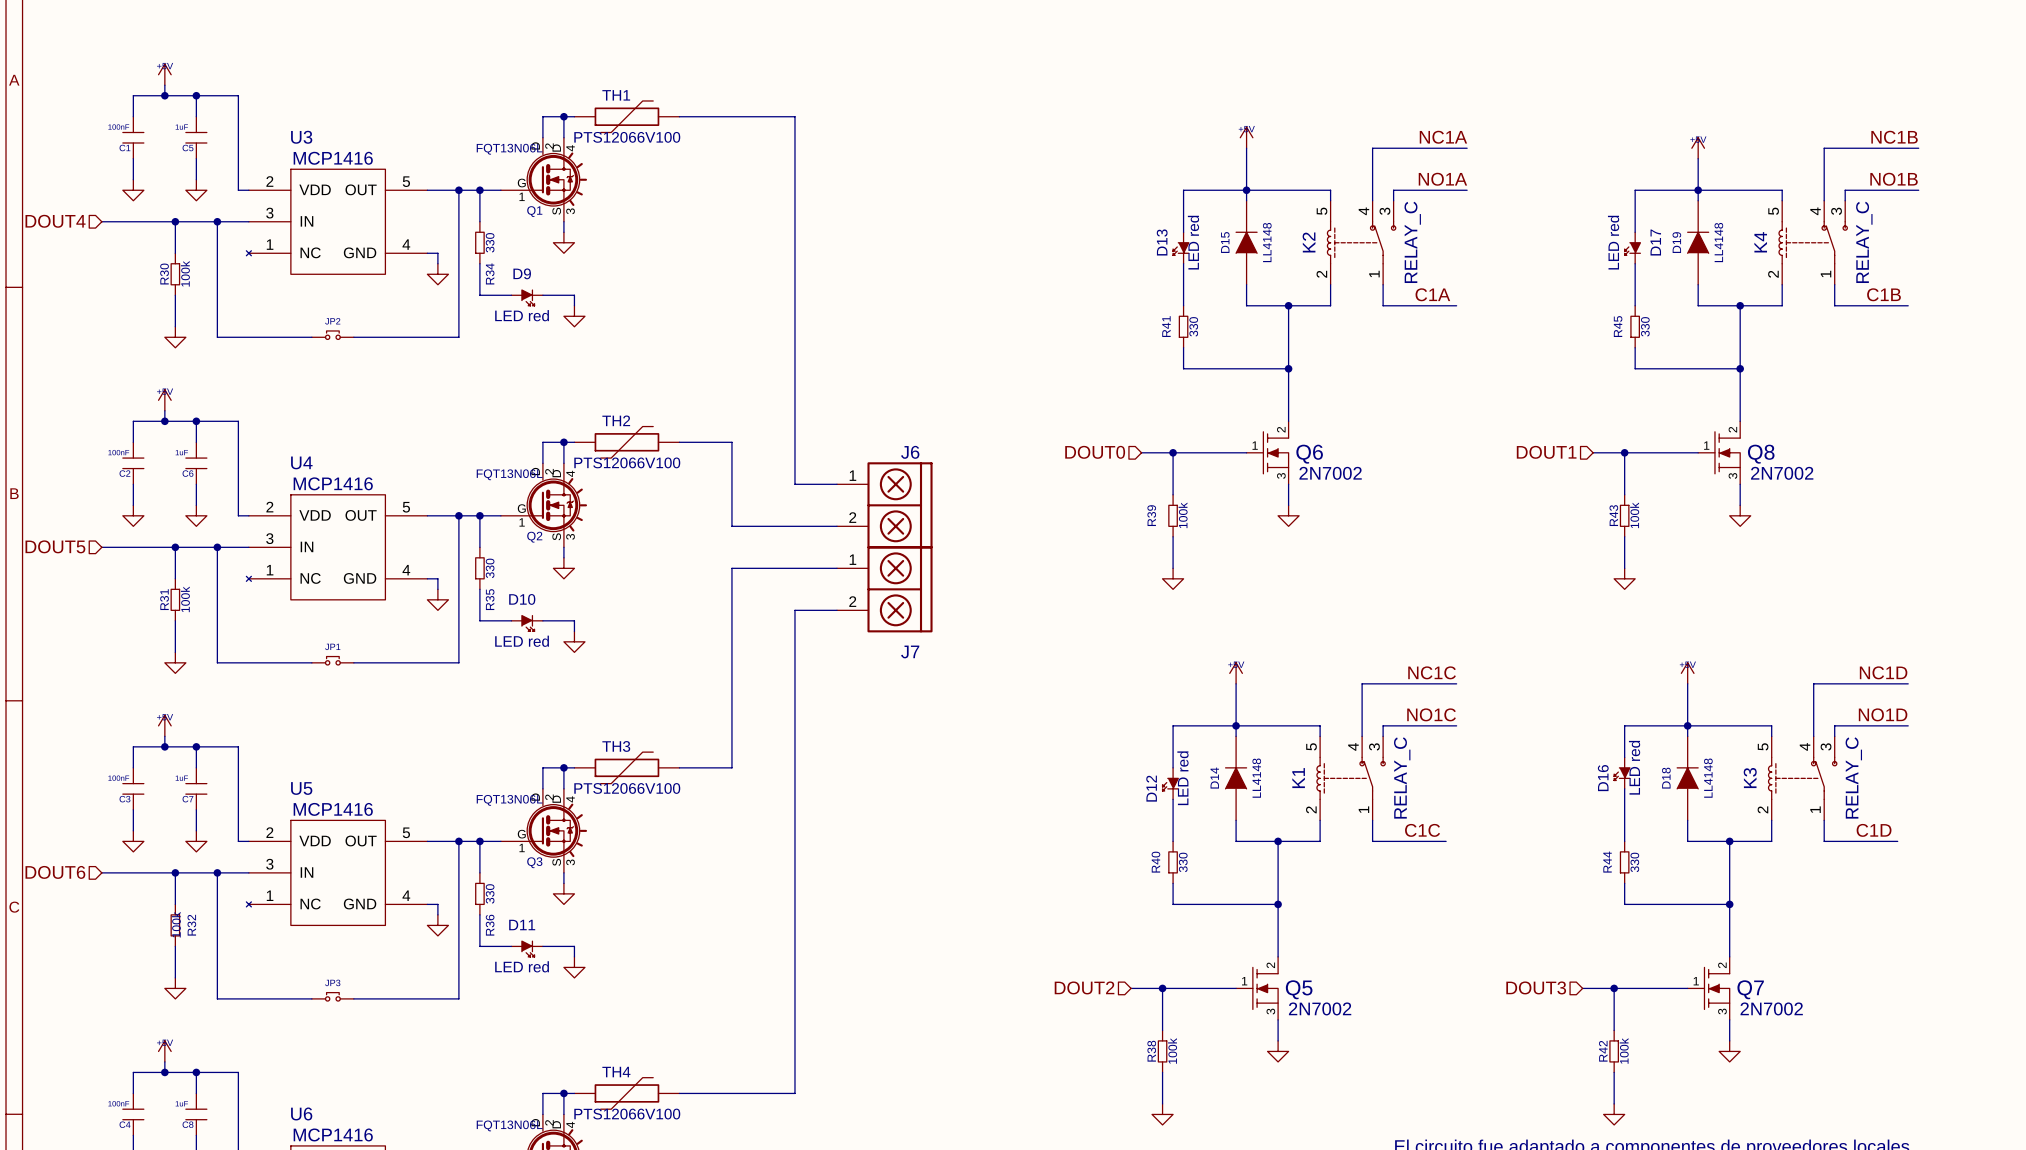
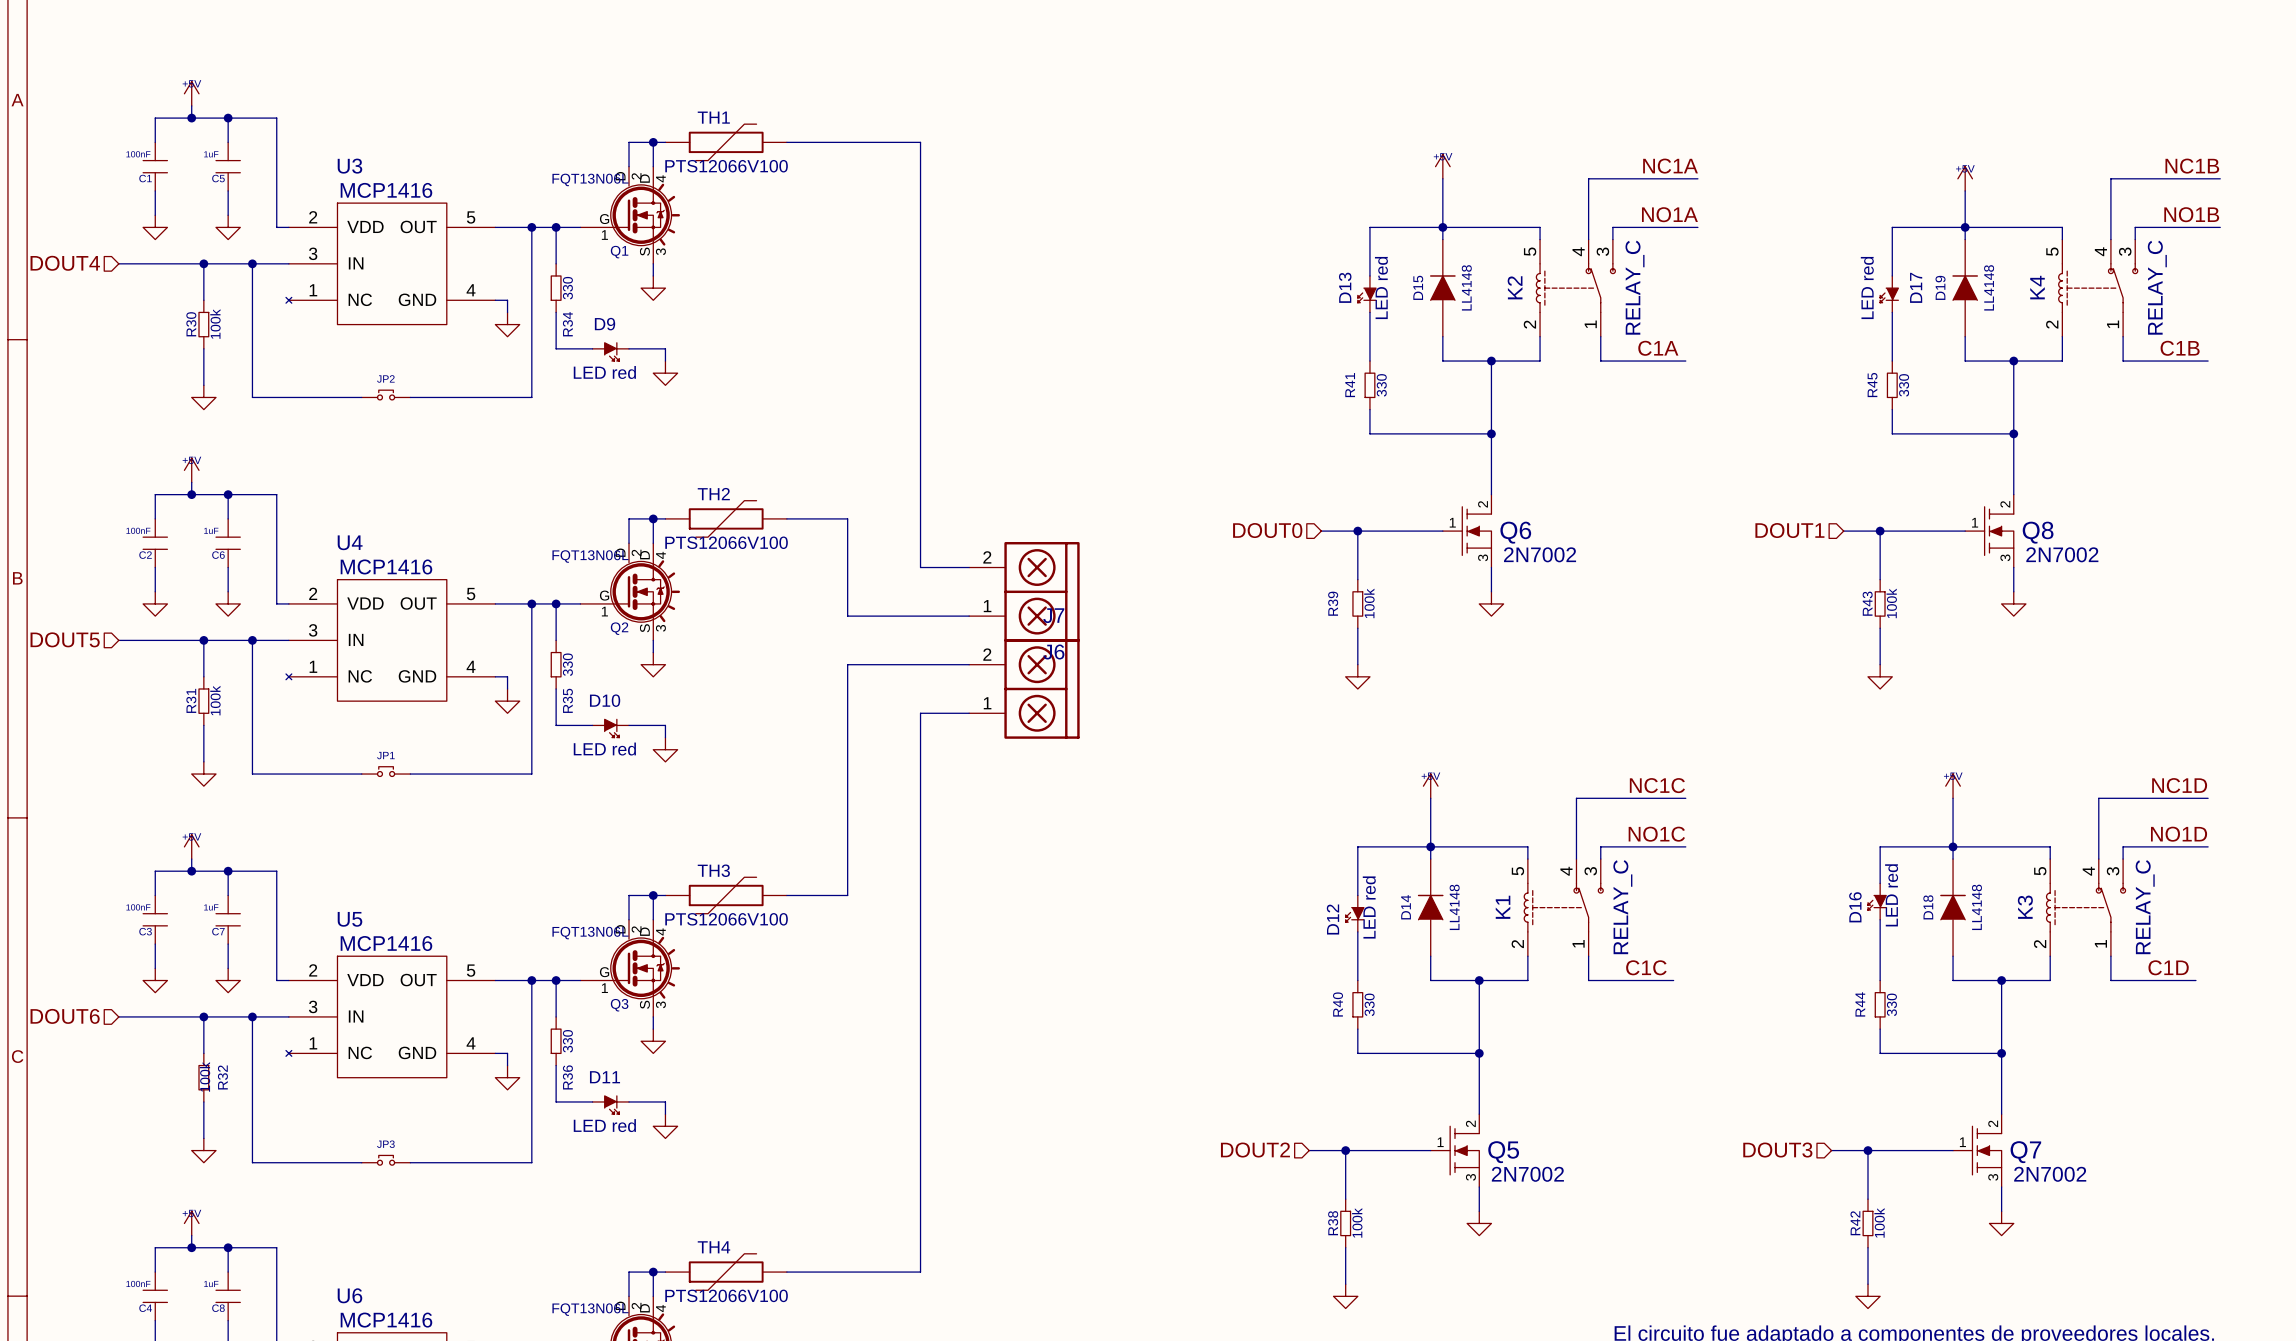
J6 flip: as is (900, 505) -> up-down (1042, 591)
J7 flip: as is (900, 589) -> up-down (1042, 688)

